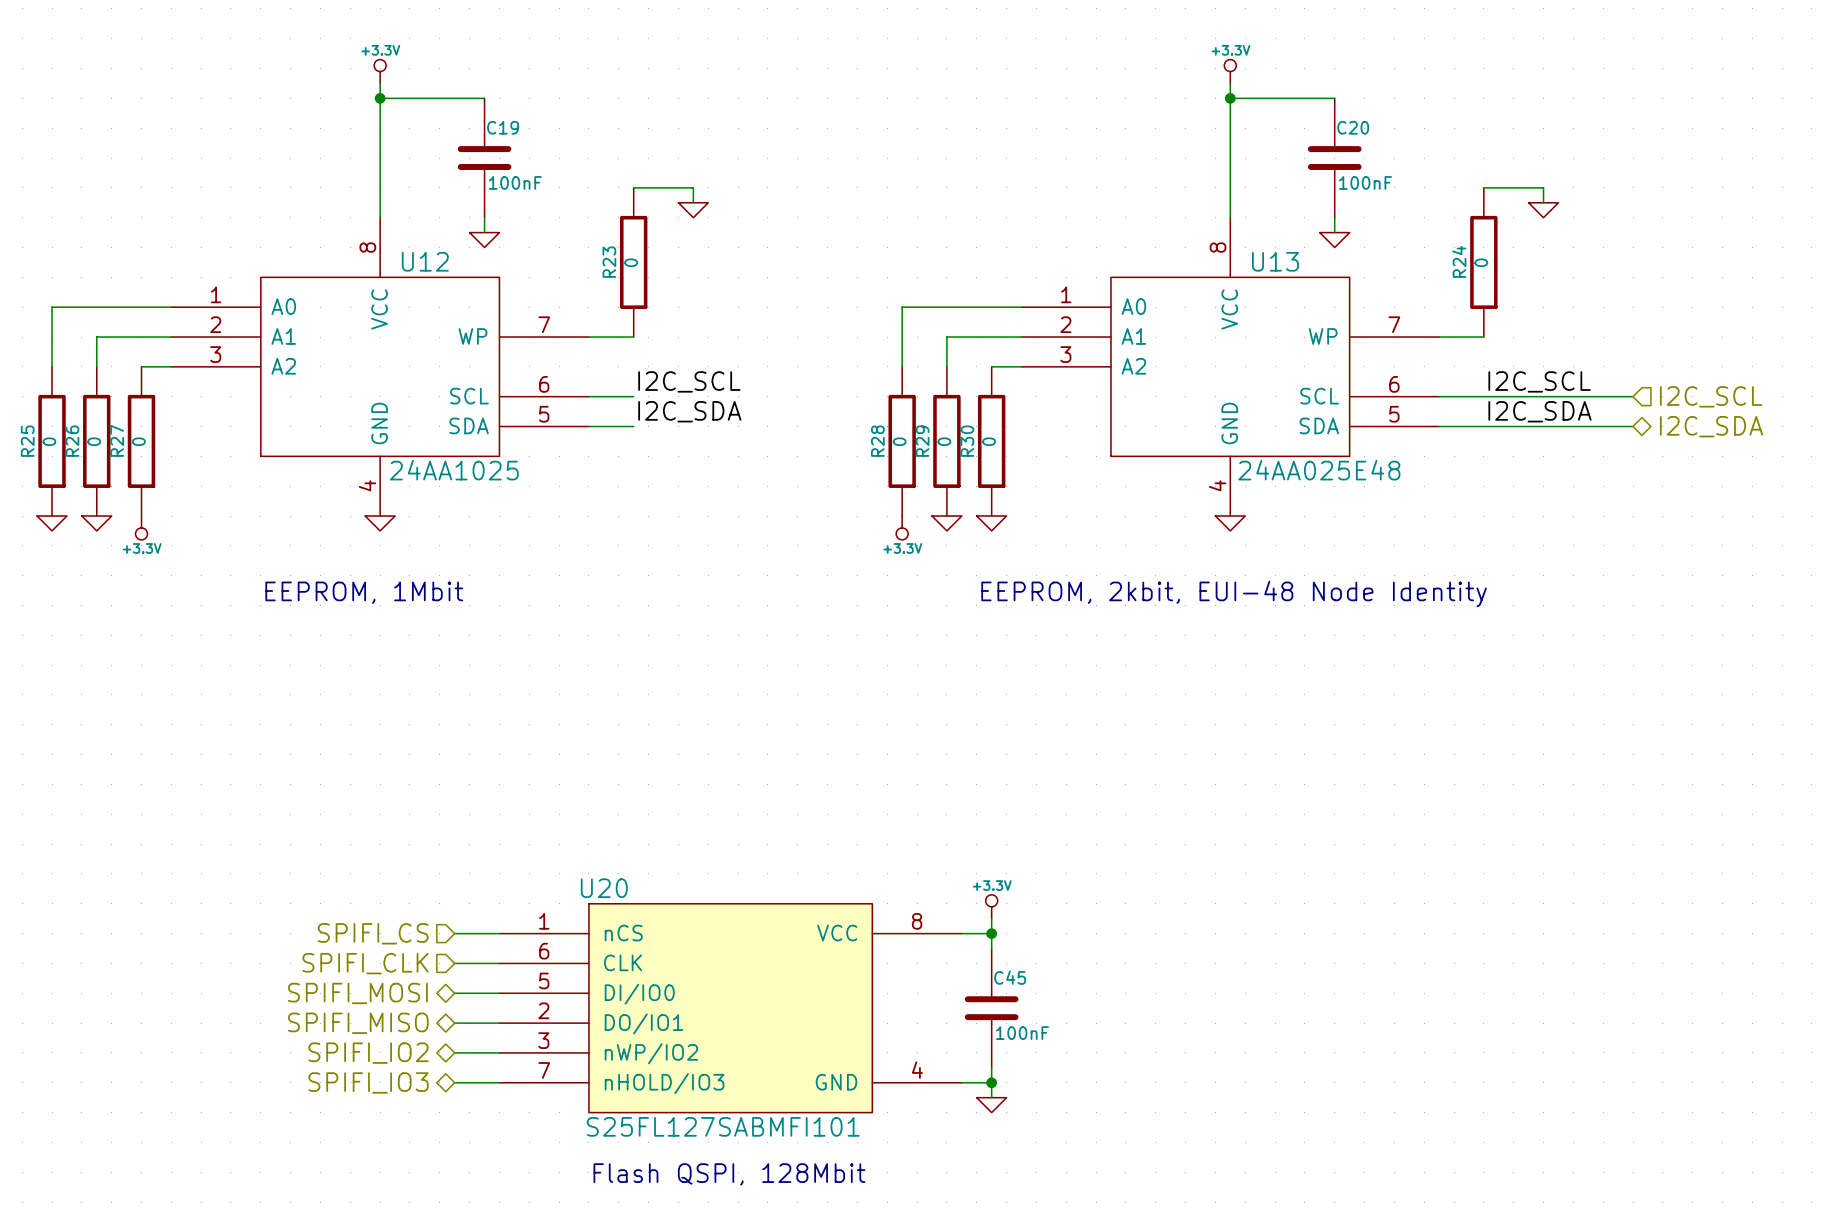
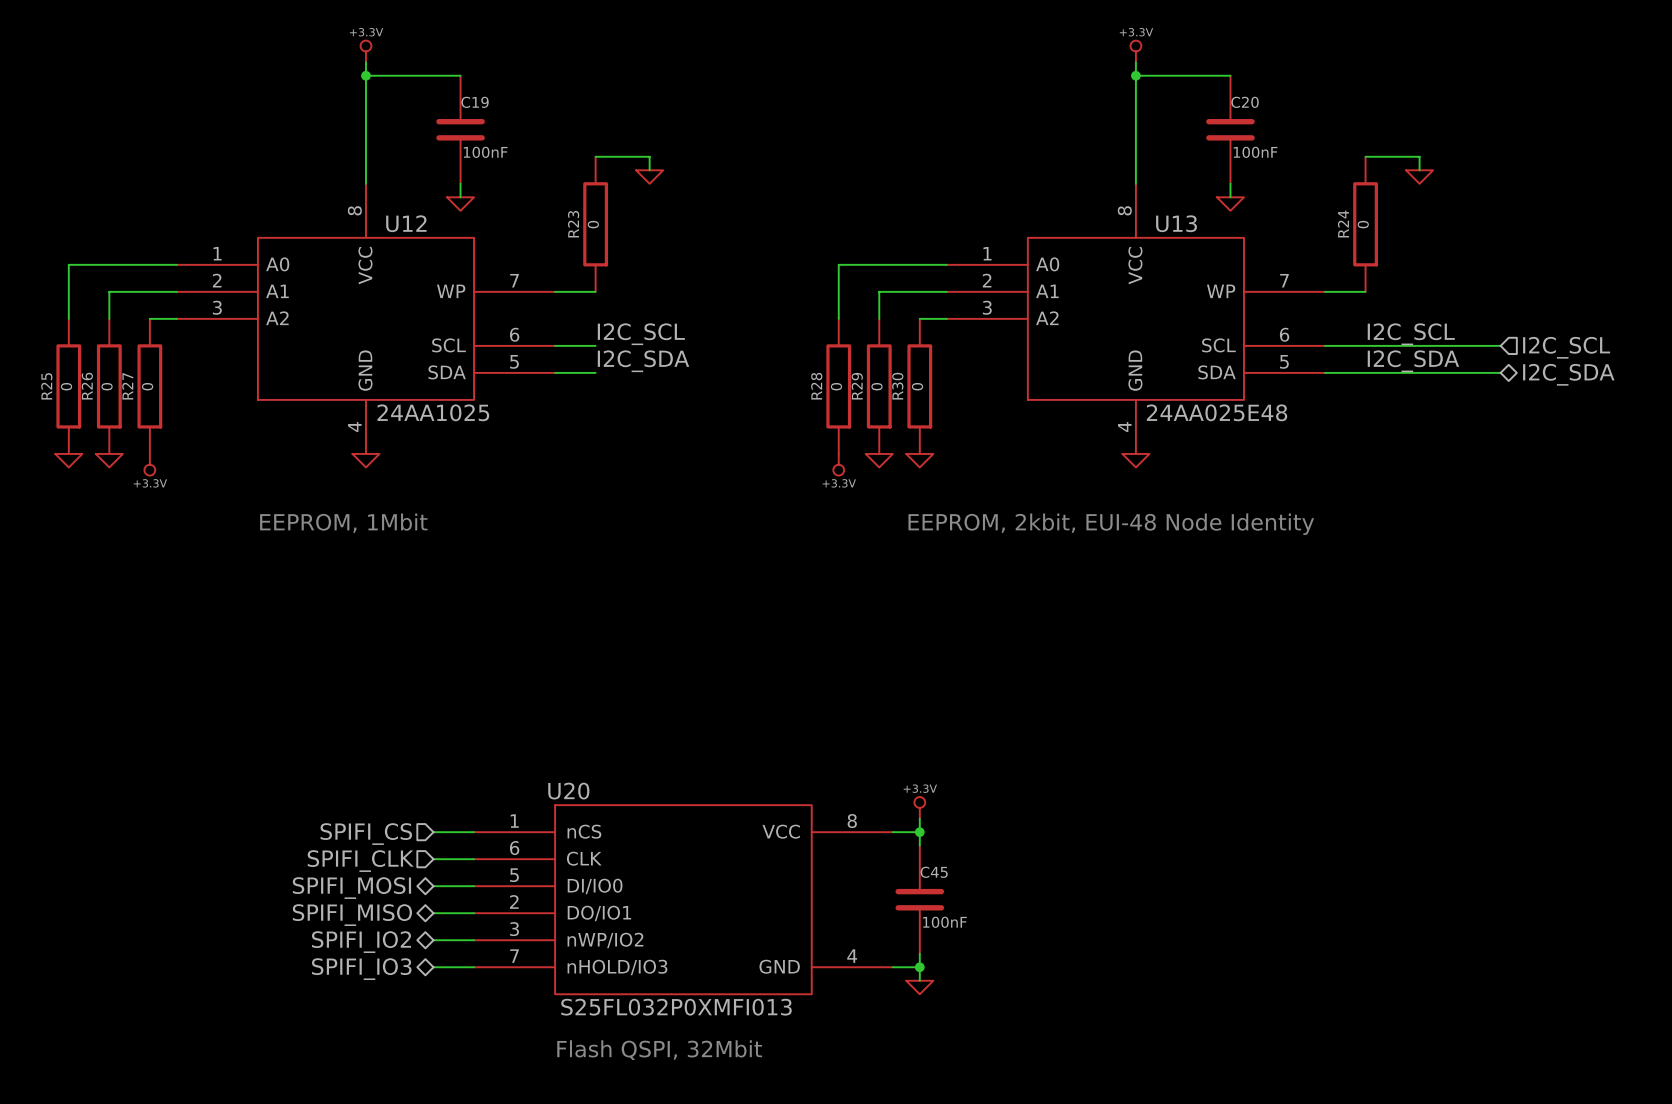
U20 value: S25FL127SABMFI101 (723, 1126) -> S25FL032P0XMFI013 (676, 1007)
text: Flash QSPI, 128Mbit (729, 1174) -> Flash QSPI, 32Mbit (659, 1050)

